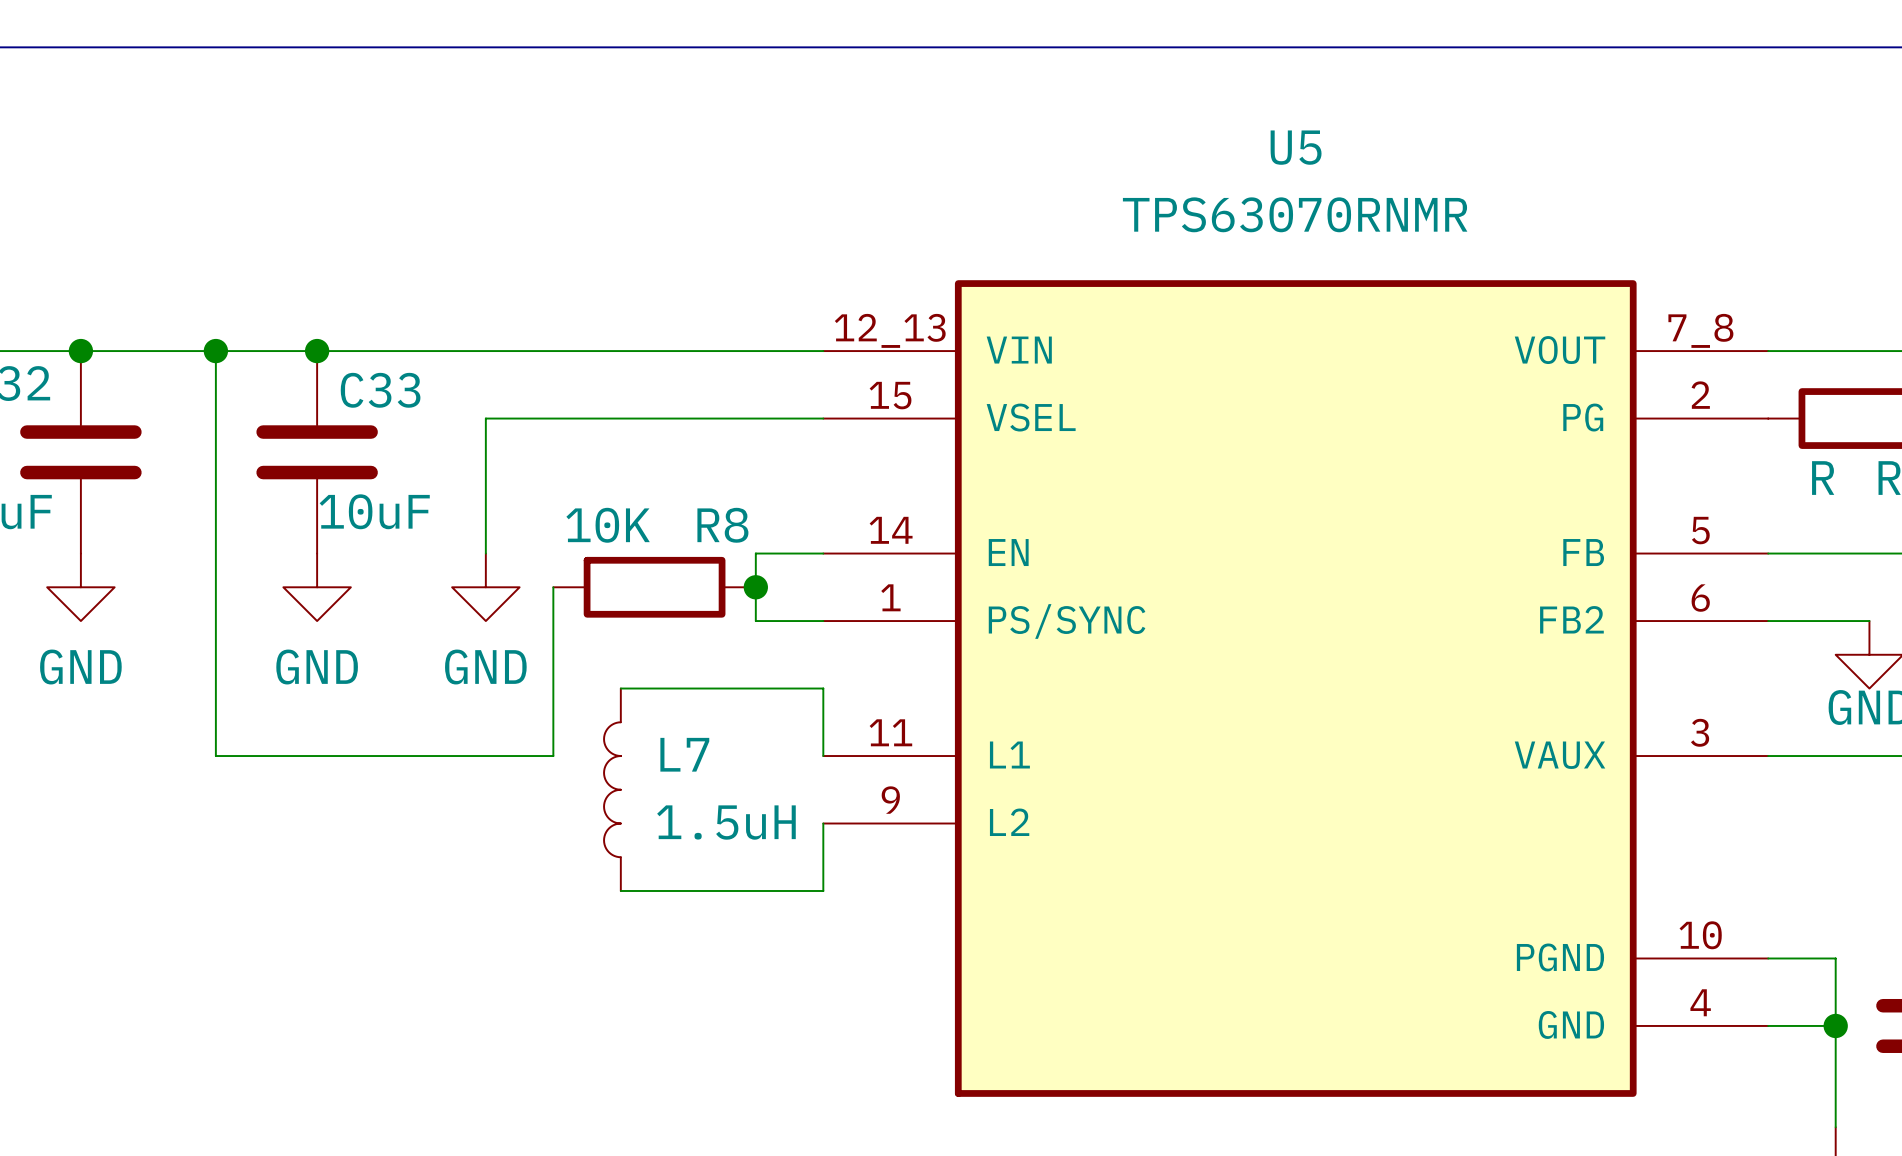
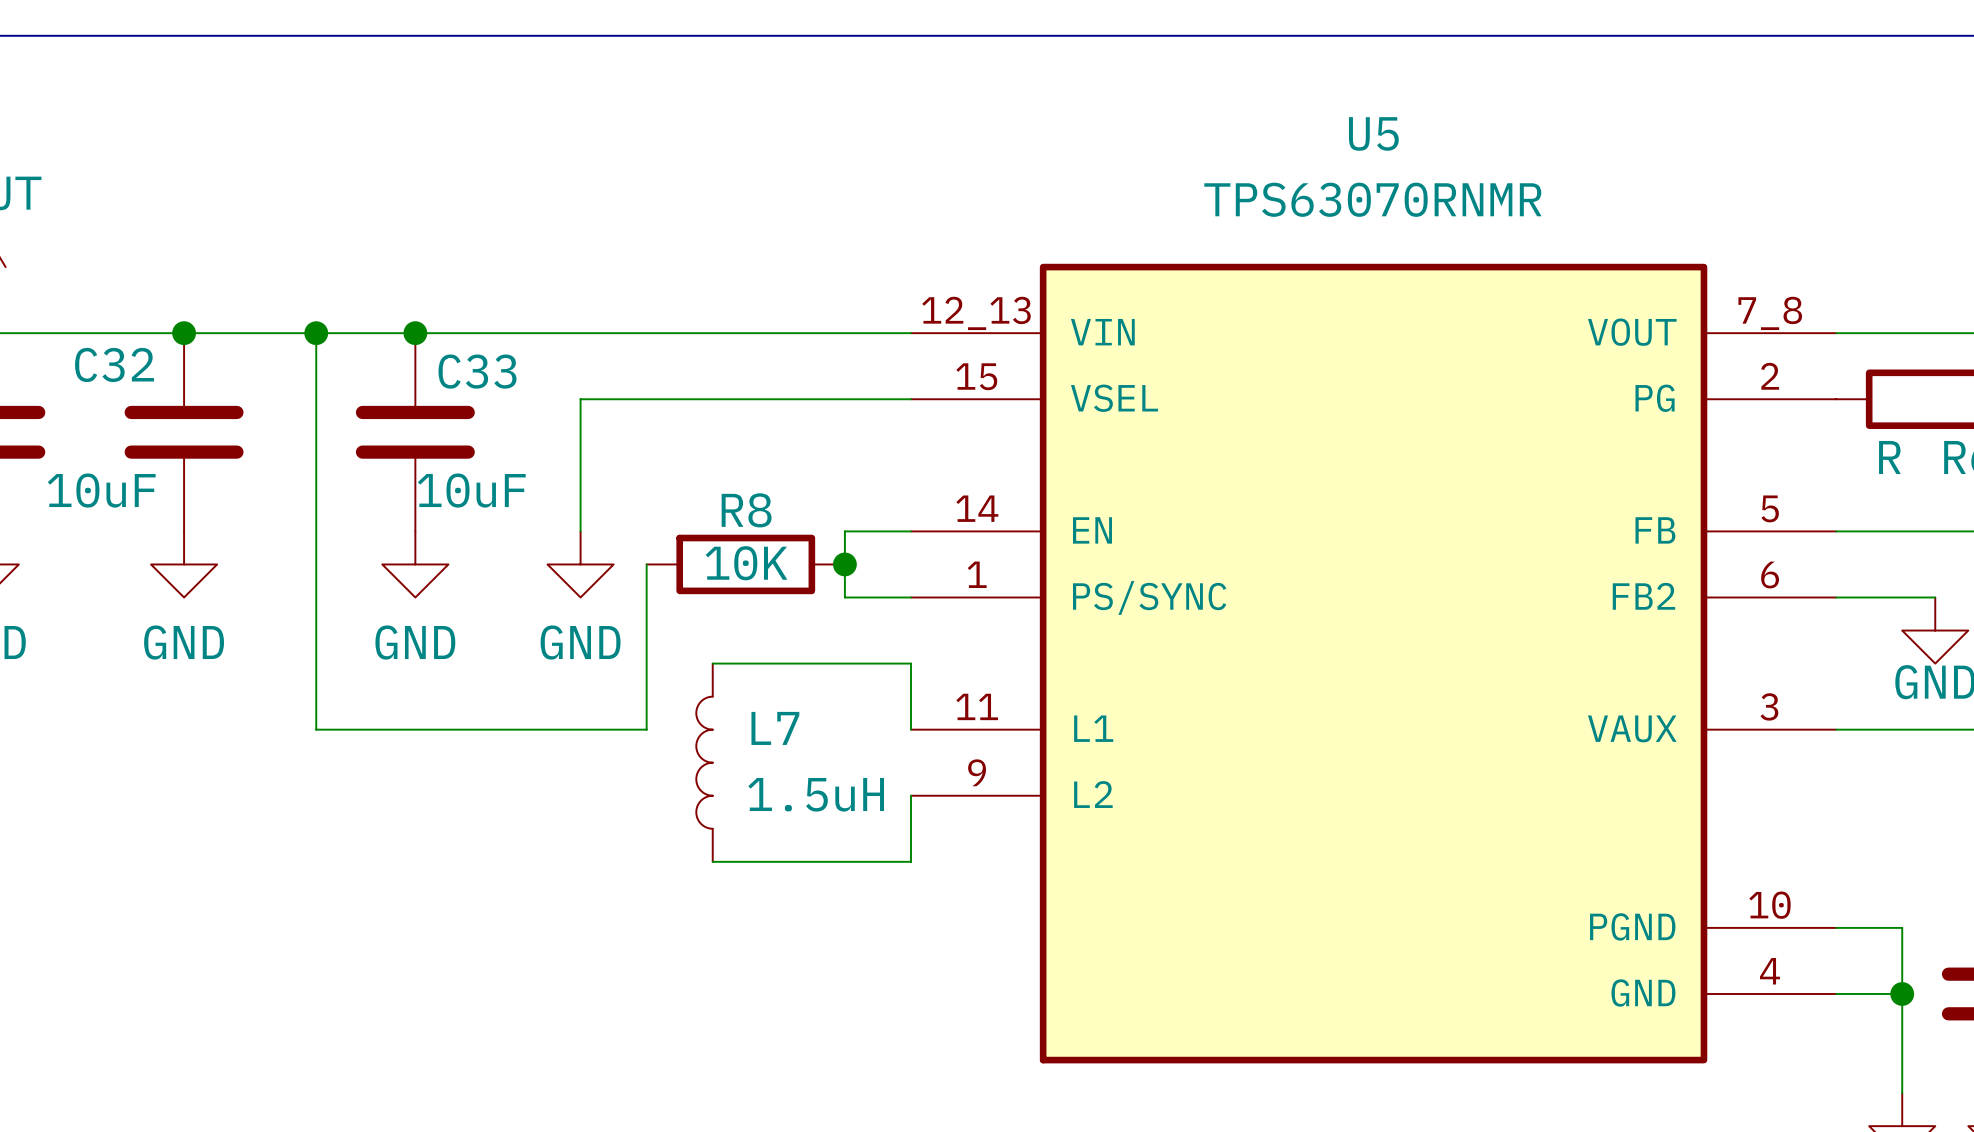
R8 value position: 10K (608, 525) -> 10K (746, 563)
R8 name position: R8 (722, 525) -> R8 (746, 510)

